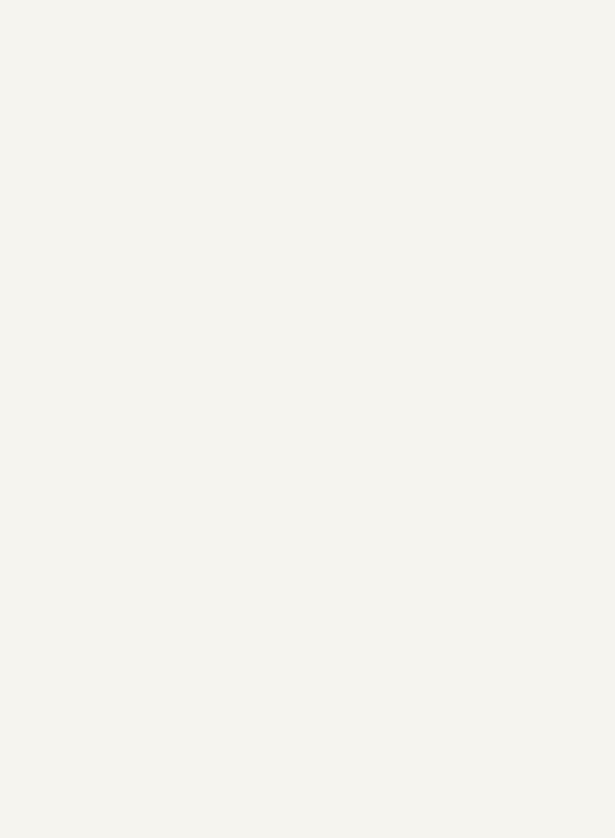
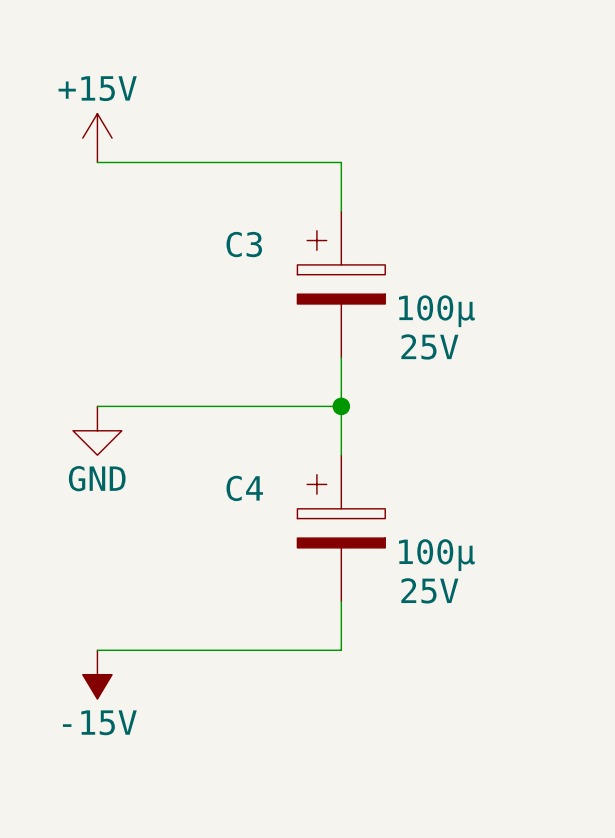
power symbol: none -> +15V (97, 138)
wire: none -> (97, 162) (341, 162) (341, 211)
C3: none -> 100µ (341, 284)
wire: none -> (341, 357) (341, 455)
wire: none -> (97, 406) (341, 406)
junction: none -> (341, 406)
power symbol: none -> GND (97, 430)
C4: none -> 100µ (341, 528)
wire: none -> (341, 601) (341, 650) (97, 650)
power symbol: none -> -15V (97, 674)

